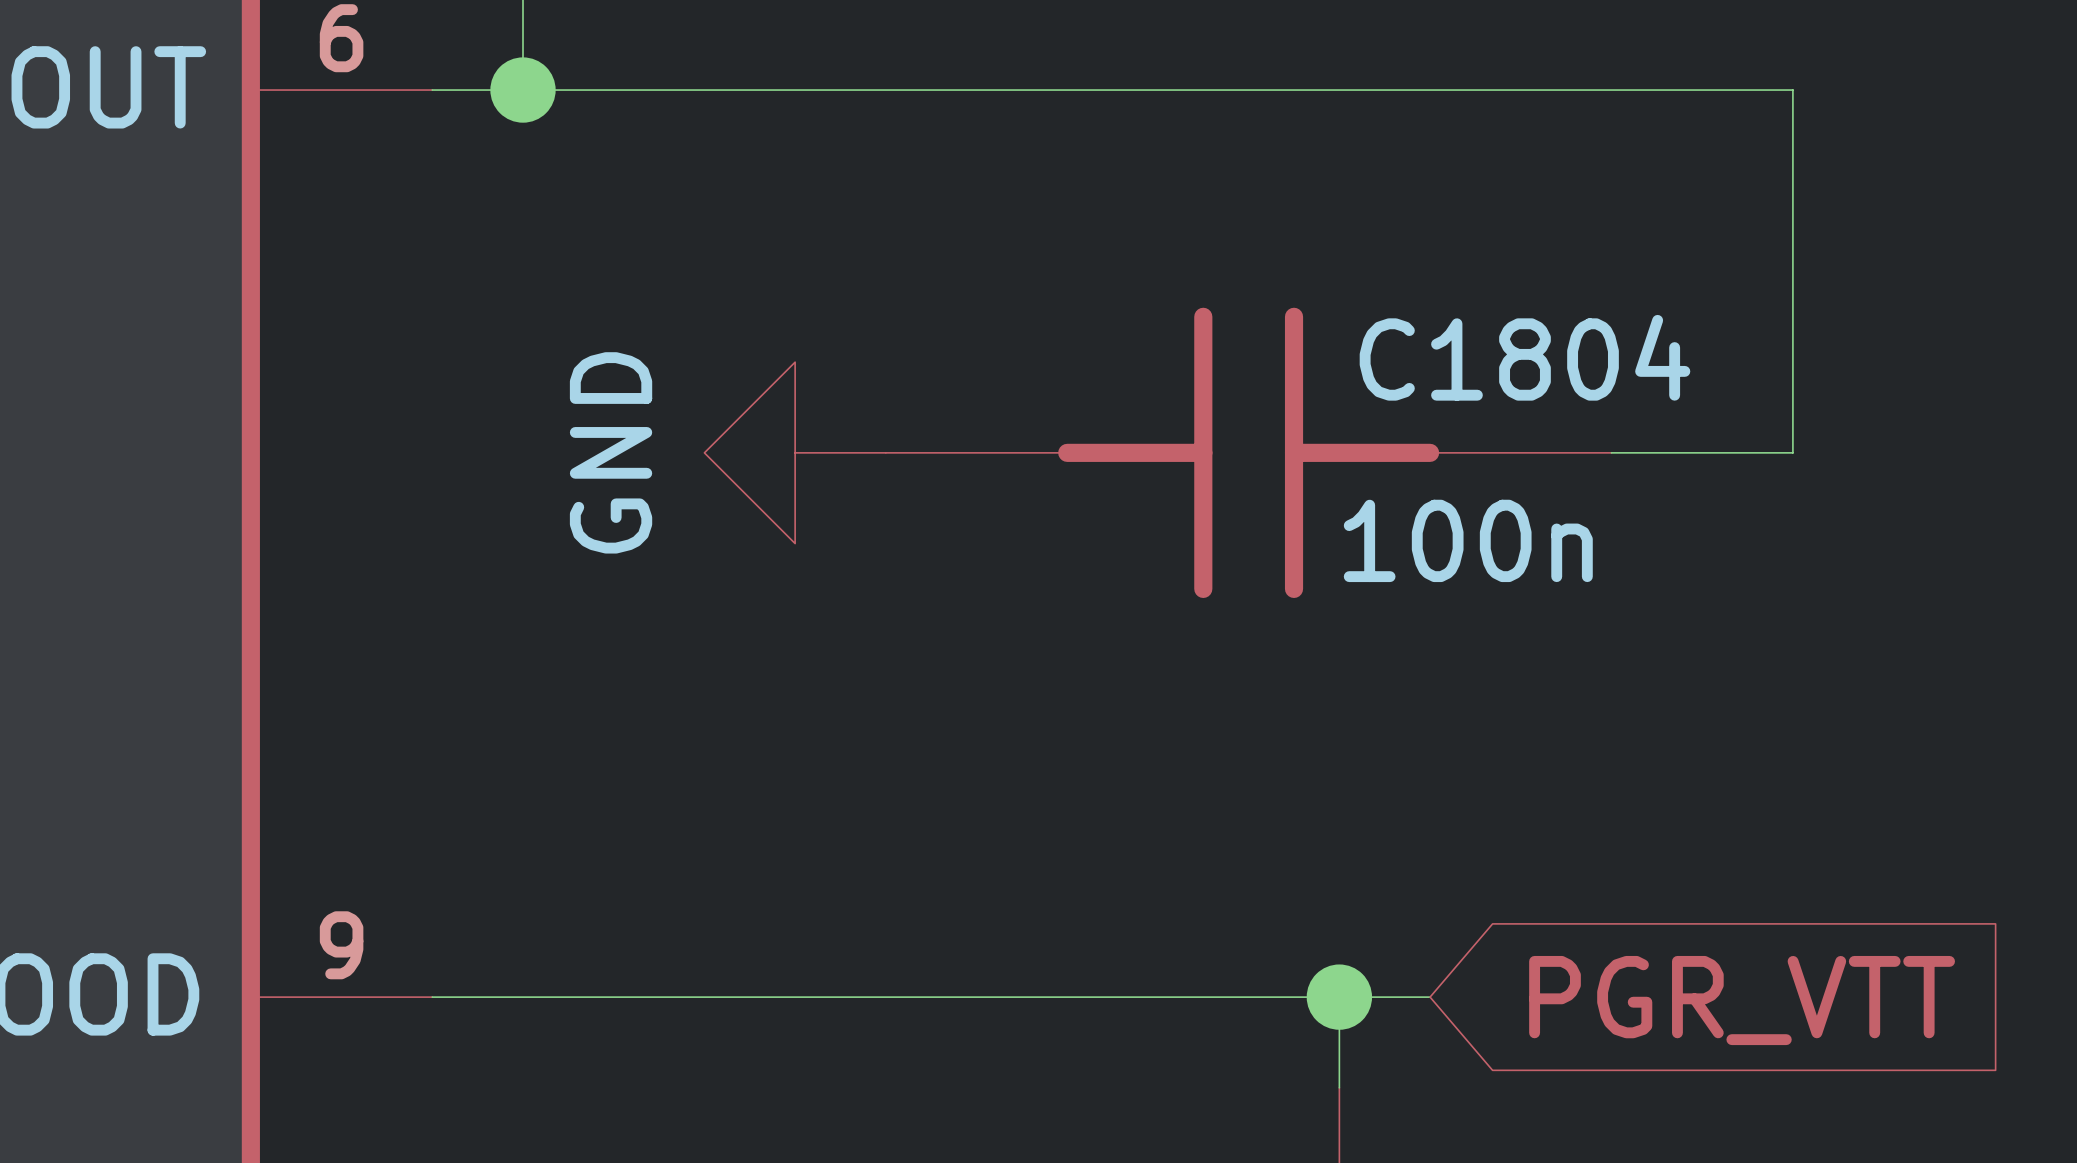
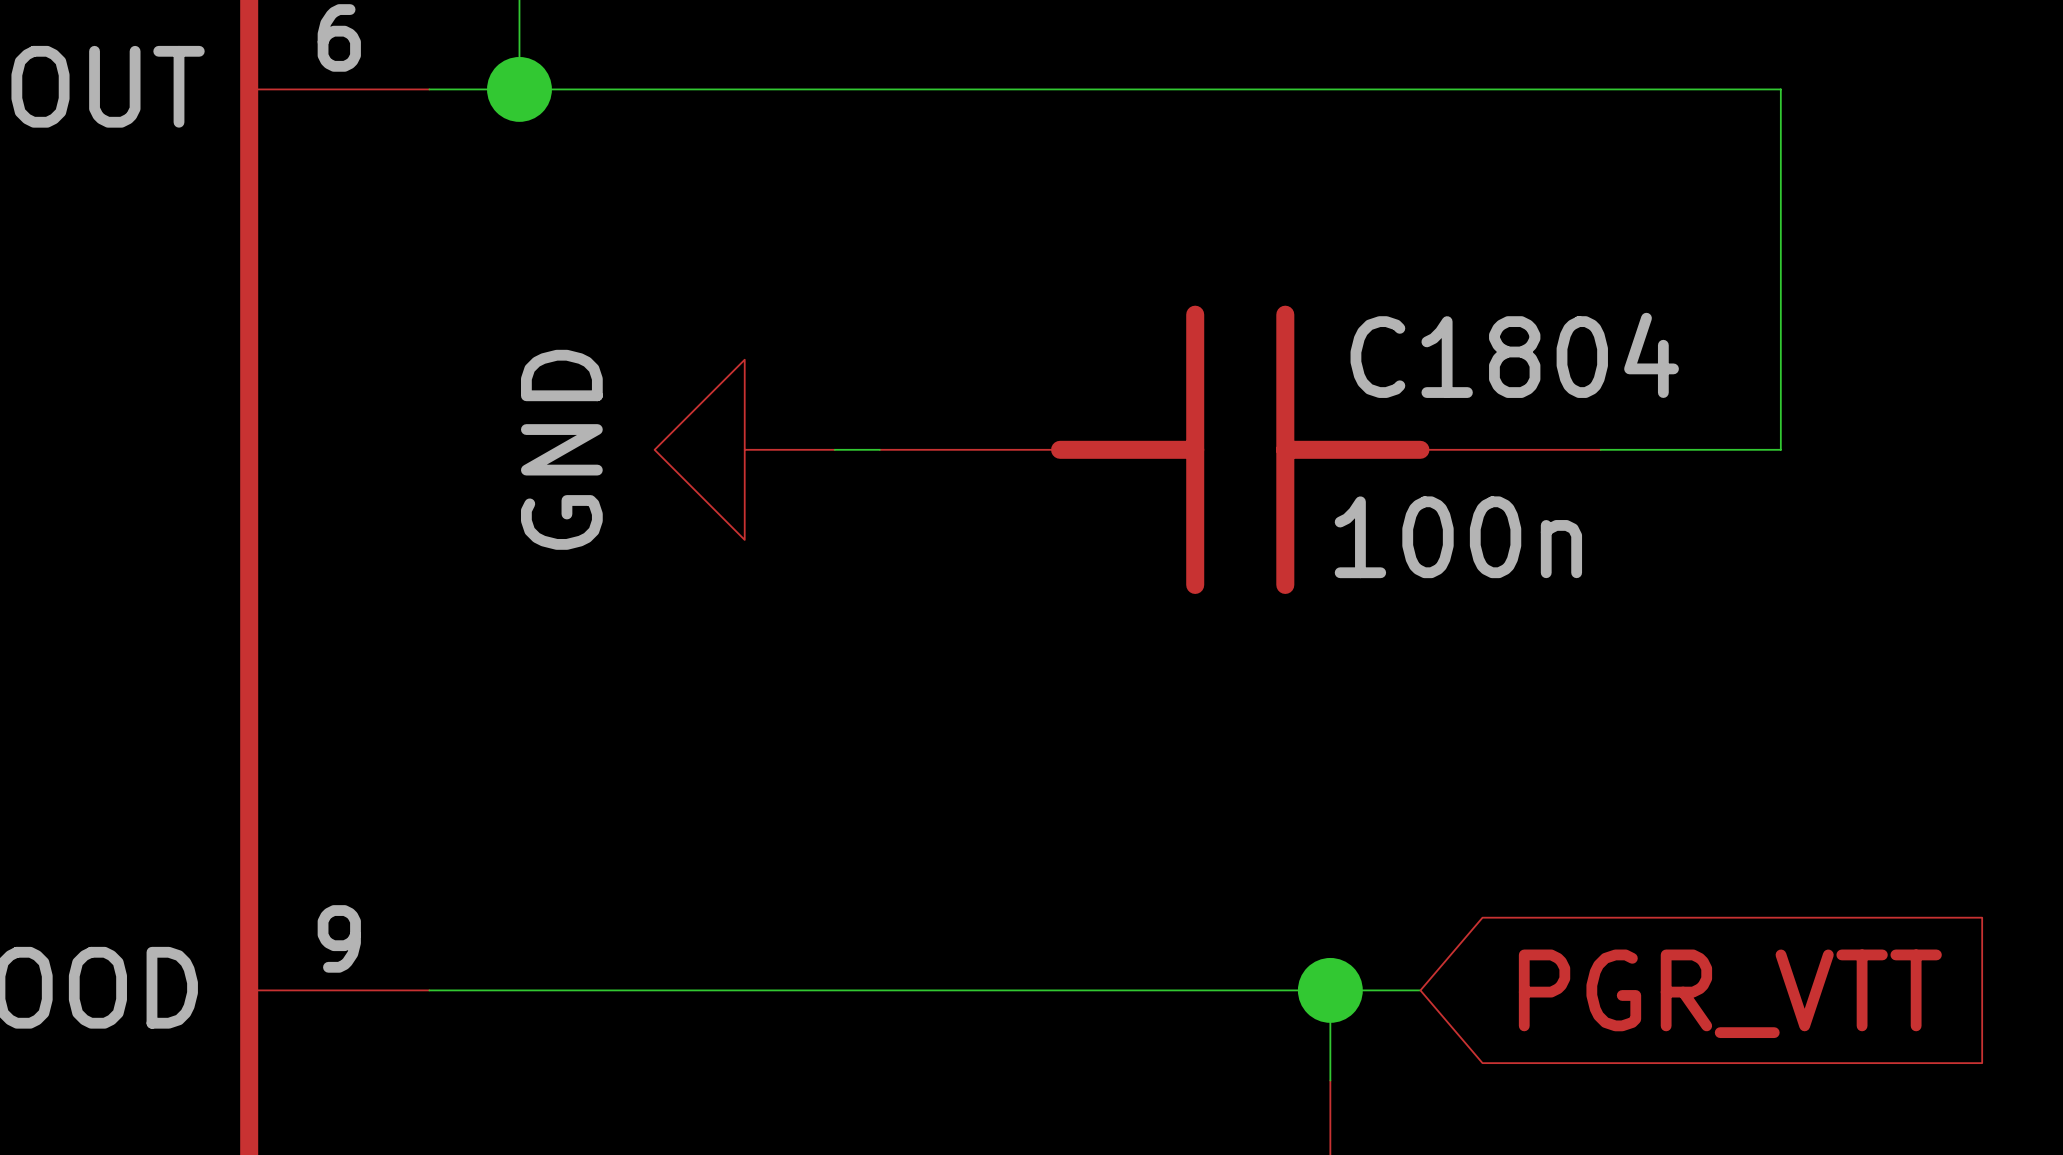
power symbol position: GND (795, 452) -> GND (744, 449)

